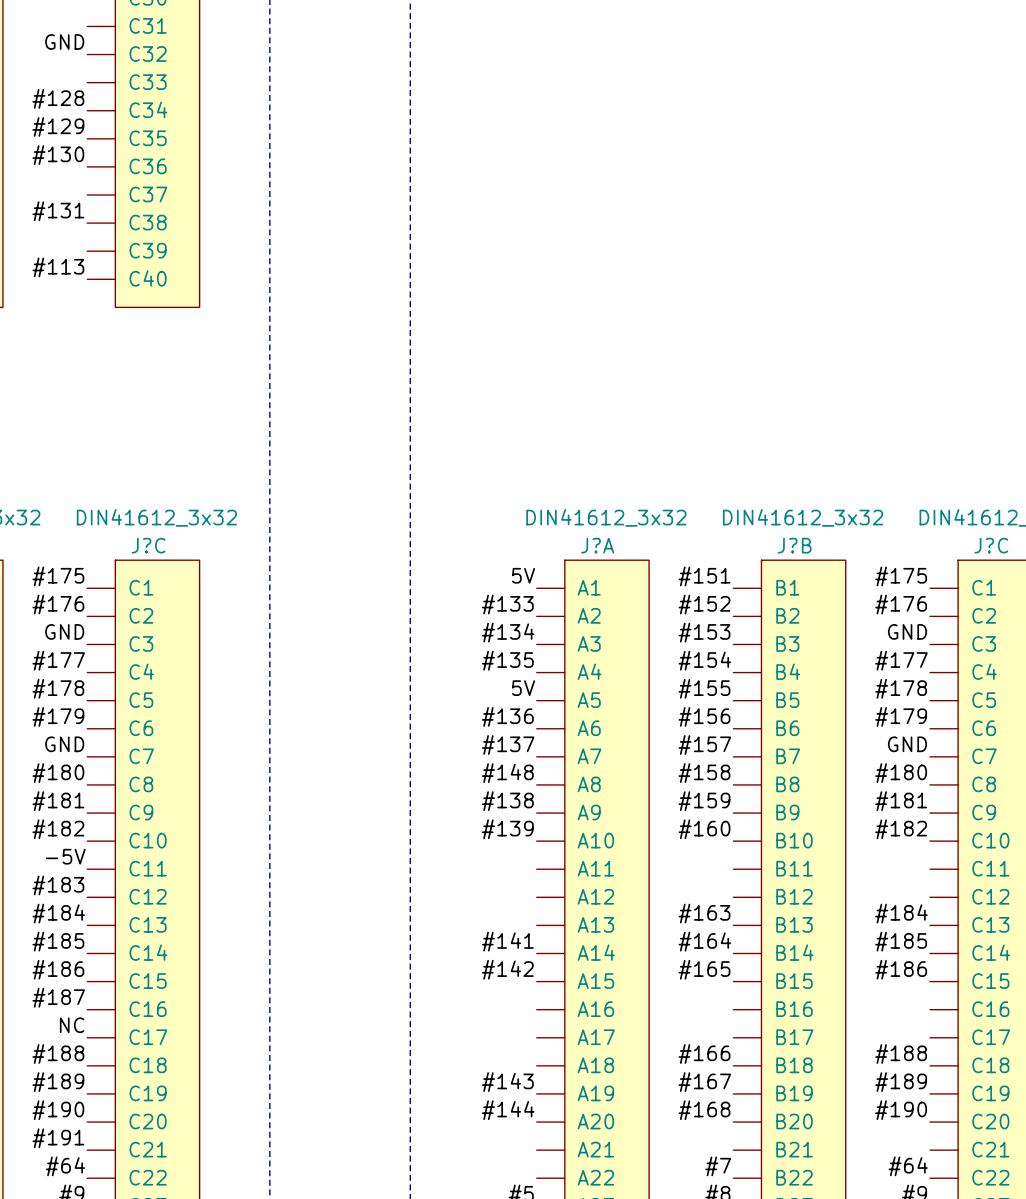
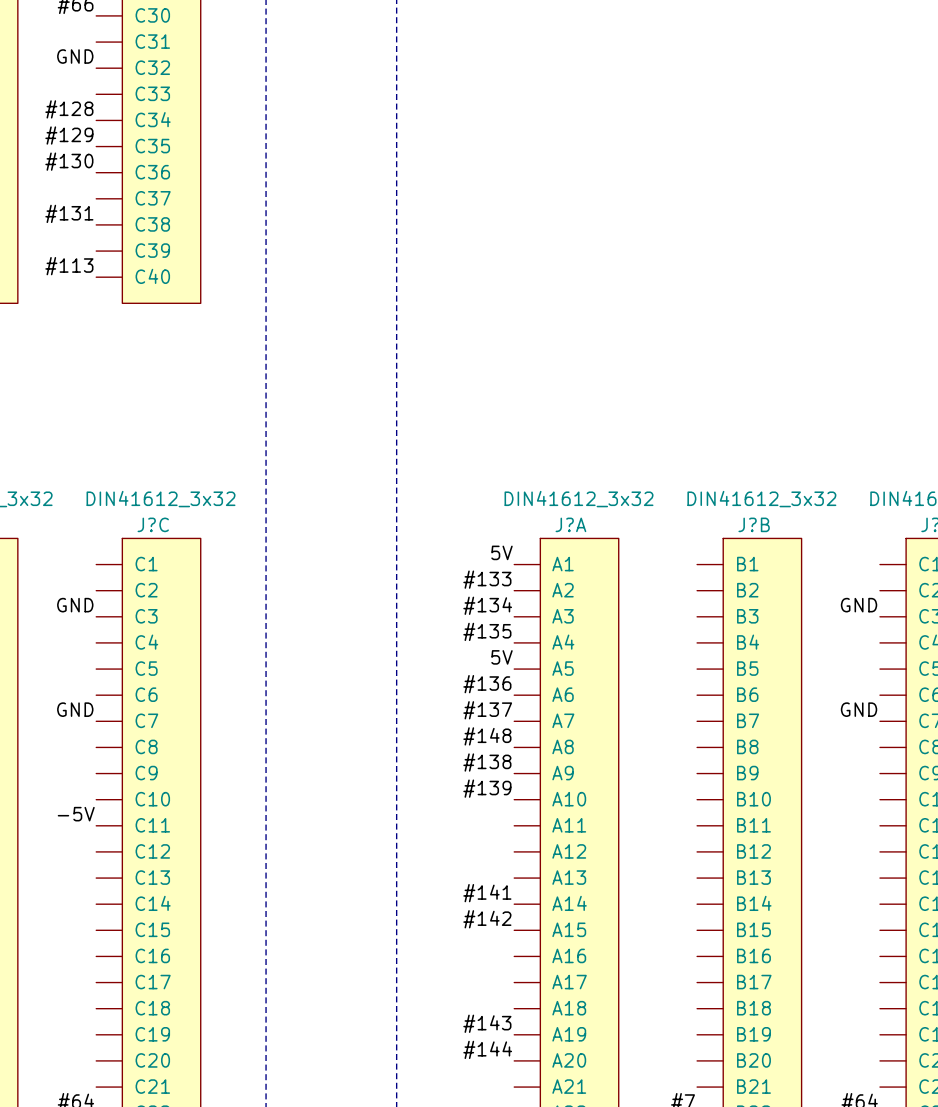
label: #175 (58, 576) -> none
label: #151 (704, 576) -> none
label: #175 (901, 576) -> none
label: #176 (58, 604) -> none
label: #152 (704, 604) -> none
label: #176 (901, 604) -> none
label: #153 (704, 632) -> none
label: #177 (58, 660) -> none
label: #154 (704, 660) -> none
label: #177 (901, 660) -> none
label: #178 (58, 688) -> none
label: #155 (704, 688) -> none
label: #178 (901, 688) -> none
label: #179 (58, 716) -> none
label: #156 (704, 716) -> none
label: #179 (901, 716) -> none
label: #157 (704, 744) -> none
label: #180 (58, 773) -> none
label: #158 (704, 773) -> none
label: #180 (901, 773) -> none
label: #181 (58, 801) -> none
label: #159 (704, 801) -> none
label: #181 (901, 801) -> none
label: #182 (58, 829) -> none
label: #160 (704, 829) -> none
label: #182 (901, 829) -> none
label: #183 (58, 885) -> none
label: #184 (58, 913) -> none
label: #163 (704, 913) -> none
label: #184 (901, 913) -> none
label: #185 (58, 941) -> none
label: #164 (704, 941) -> none
label: #185 (901, 941) -> none
label: #186 (58, 969) -> none
label: #165 (704, 969) -> none
label: #186 (901, 969) -> none
label: #187 (58, 997) -> none
label: NC (72, 1025) -> none
label: #188 (58, 1054) -> none
label: #166 (704, 1054) -> none
label: #188 (901, 1054) -> none
label: #189 (58, 1082) -> none
label: #167 (704, 1082) -> none
label: #189 (901, 1082) -> none
label: #190 (58, 1110) -> none
label: #168 (704, 1110) -> none
label: #190 (901, 1110) -> none
label: #191 (58, 1138) -> none

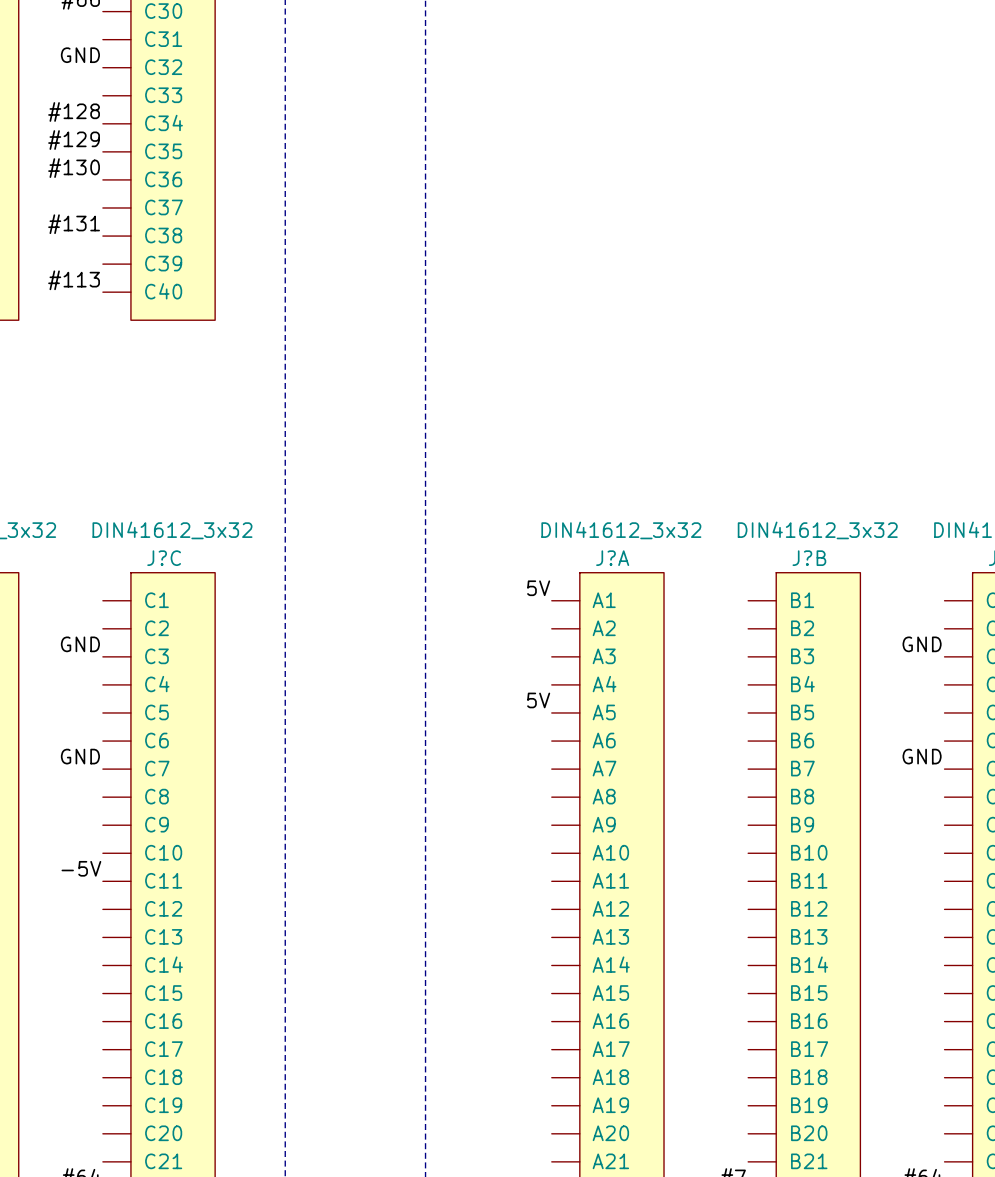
label: #133 (487, 579) -> none
label: #134 (487, 605) -> none
label: #135 (487, 631) -> none
label: #136 (487, 684) -> none
label: #137 (487, 710) -> none
label: #148 (487, 736) -> none
label: #138 (487, 762) -> none
label: #139 (487, 788) -> none
label: #141 (487, 893) -> none
label: #142 (487, 919) -> none
label: #143 (487, 1023) -> none
label: #144 (487, 1049) -> none

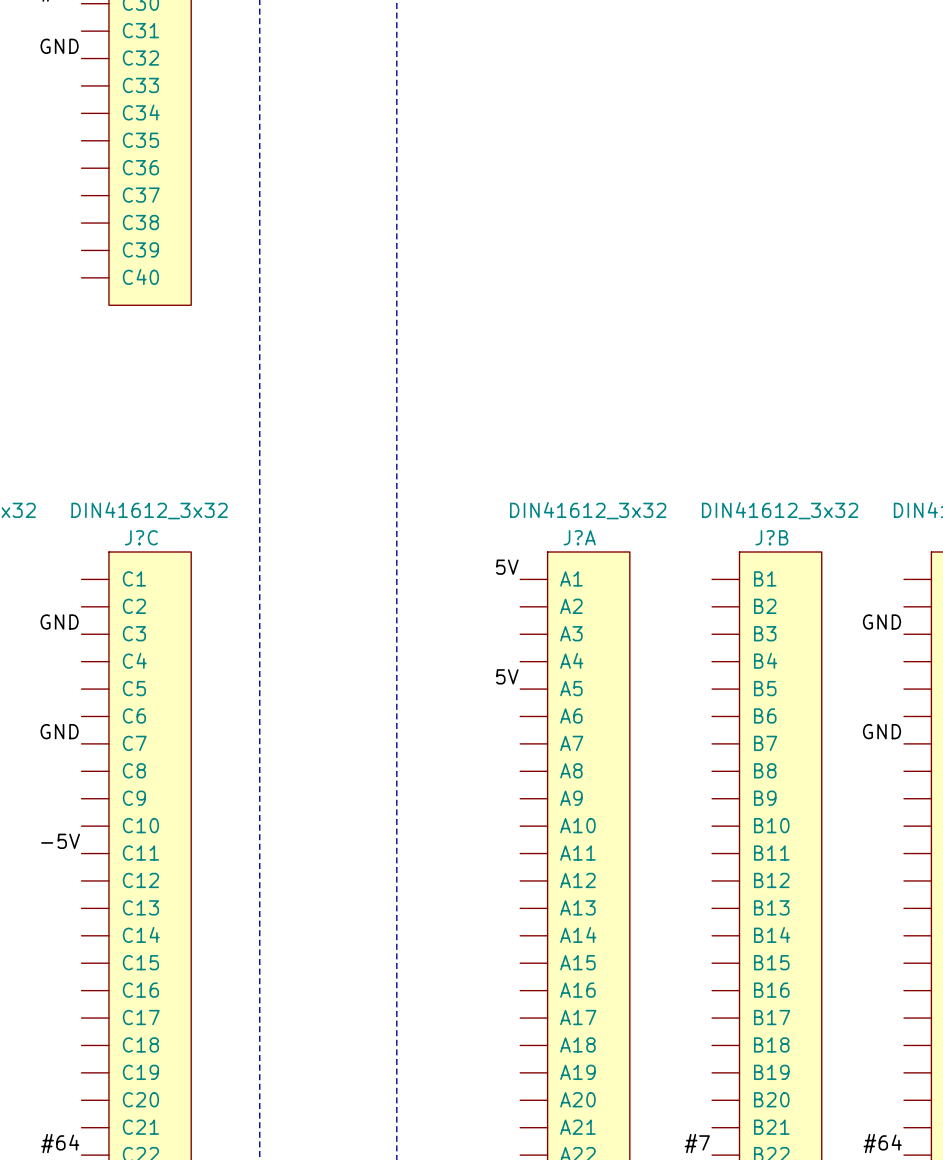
label: #128 (74, 111) -> none
label: #129 (74, 140) -> none
label: #130 (74, 168) -> none
label: #131 (74, 224) -> none
label: #113 (74, 280) -> none

